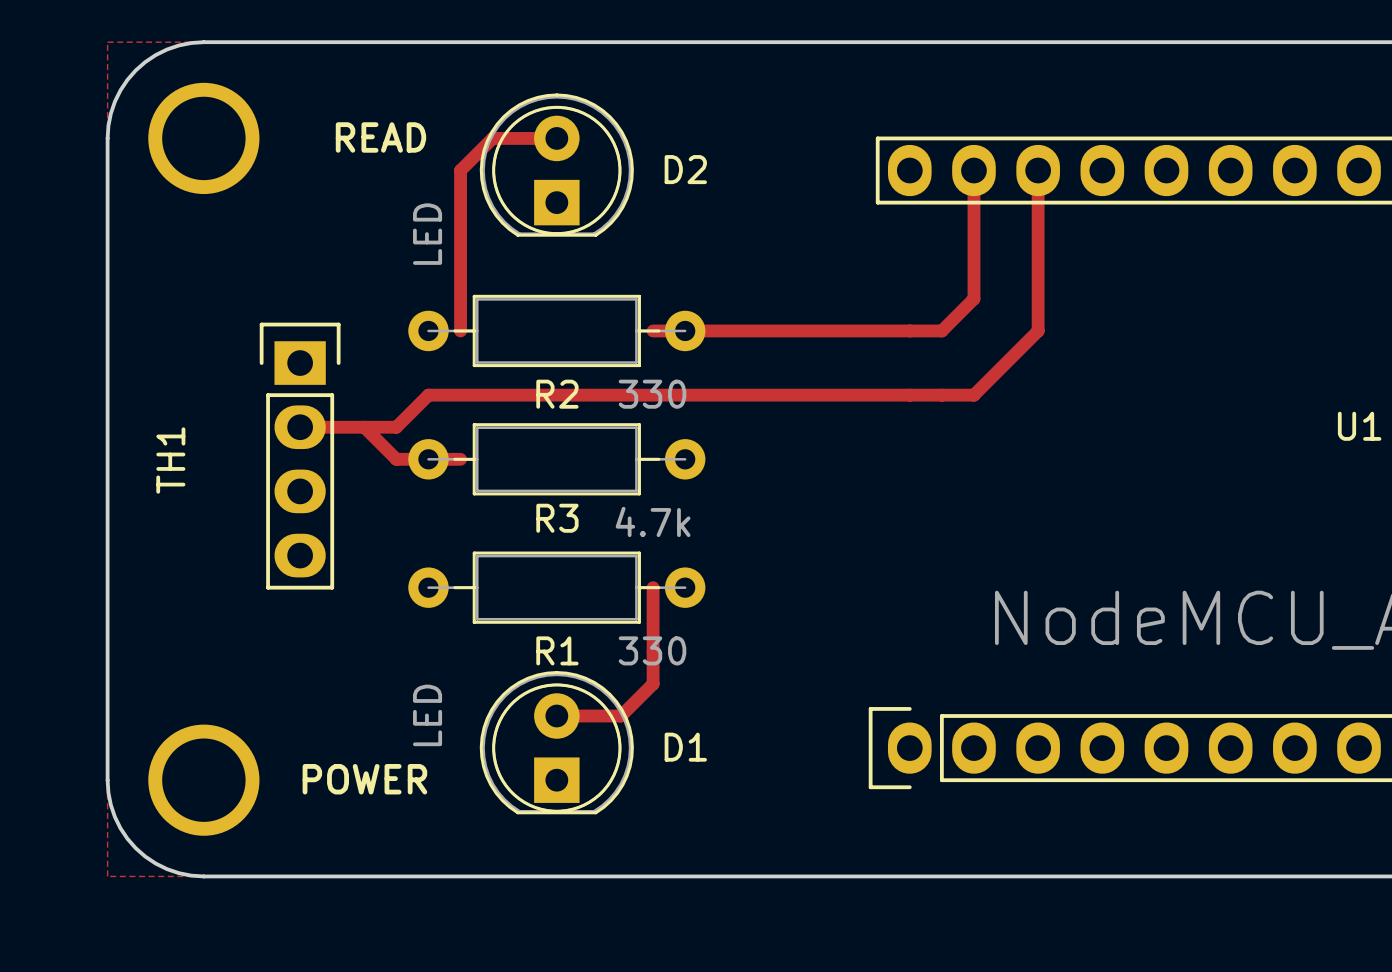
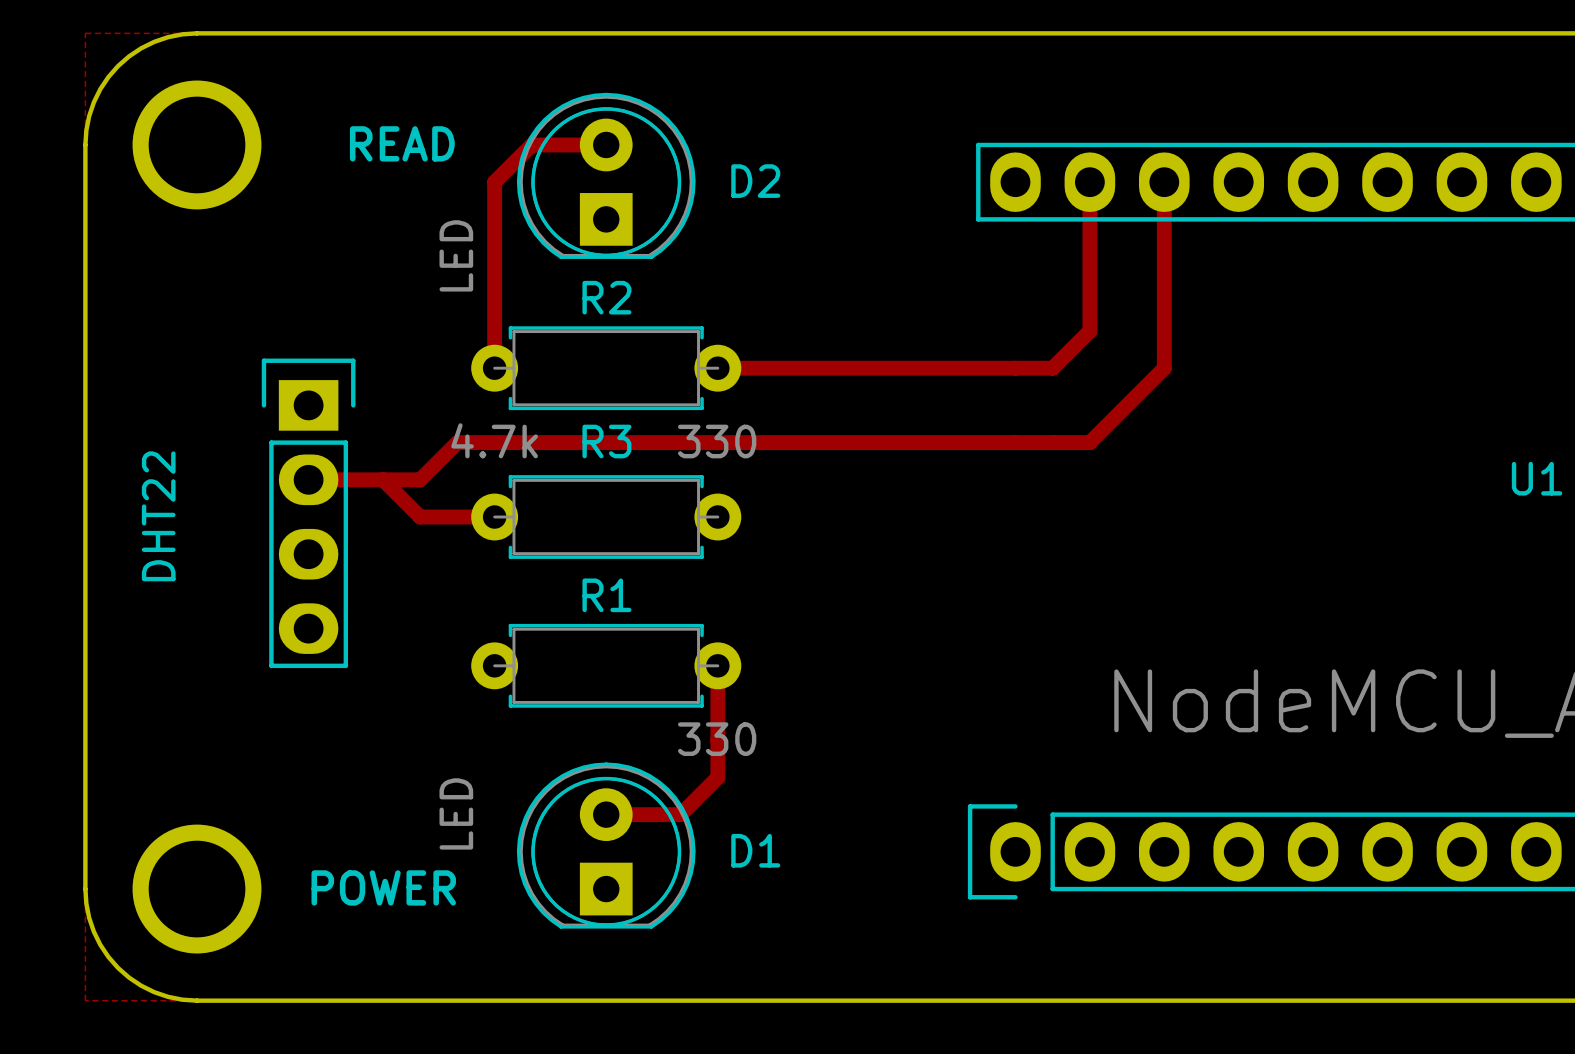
R2 footprint: [408, 294, 706, 368] -> [471, 326, 742, 411]
R2 name position: R2 (557, 394) -> R2 (606, 297)
R3 footprint: [408, 423, 706, 496] -> [471, 475, 742, 559]
TH1 name: TH1 (170, 460) -> DHT22 (158, 516)
R3 name position: R3 (557, 518) -> R3 (606, 441)
R3 value position: 4.7k (653, 521) -> 4.7k (494, 440)
R1 footprint: [408, 551, 706, 624] -> [471, 623, 742, 708]
R1 name position: R1 (557, 650) -> R1 (606, 595)

